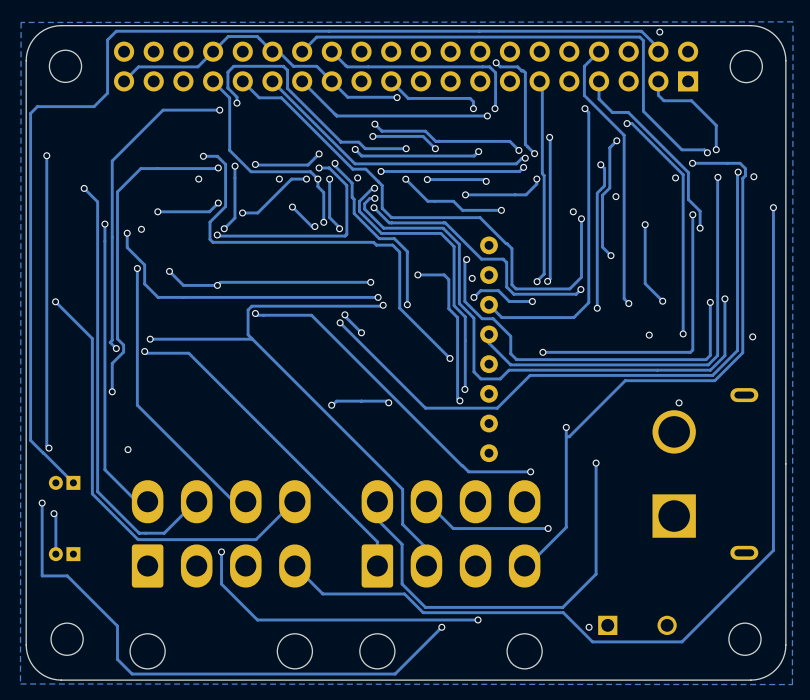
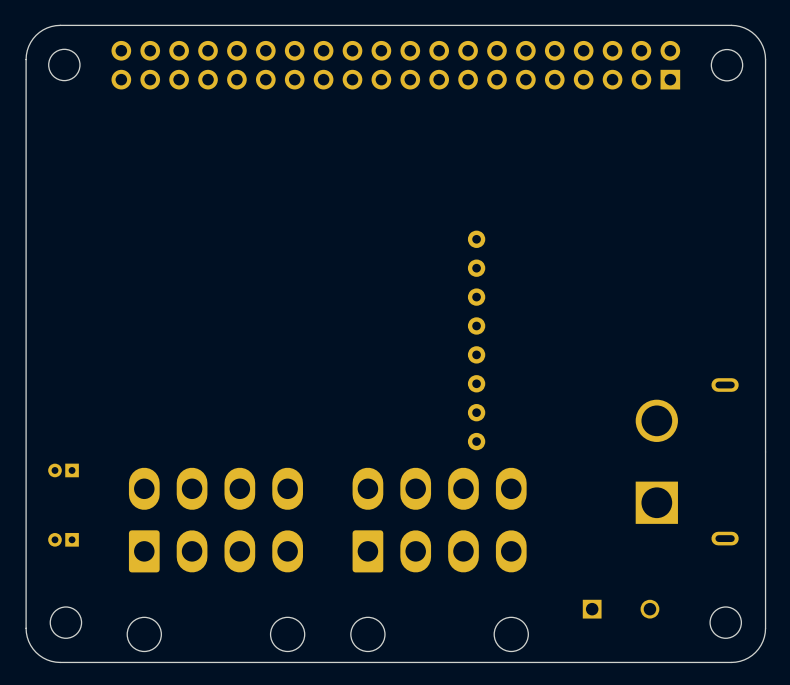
zone outline: (793, 21) (792, 684) (20, 683) (21, 22) (793, 21) -> none
via: (659, 32) -> none
track: (302, 48) (302, 51) (316, 37) (639, 37) (643, 40) (643, 111) (681, 149) (704, 149) (707, 152) -> none
track: (331, 51) (345, 65) -> none
track: (599, 51) (584, 66) (584, 95) (624, 135) (624, 298) (628, 303) -> none
track: (658, 51) (658, 48) (641, 31) (116, 31) (107, 40) (107, 93) (94, 106) (37, 106) (30, 113) (30, 440) (73, 482) -> none
track: (496, 62) (500, 66) (517, 66) (525, 72) (525, 144) (534, 153) -> none
via: (496, 62) -> none
track: (345, 65) (489, 66) (495, 72) (495, 108) -> none
track: (124, 81) (138, 66) (197, 66) (228, 36) (257, 36) (272, 51) (278, 51) (293, 66) (316, 66) (347, 97) (397, 97) -> none
track: (242, 81) (259, 97) (281, 97) (352, 169) (365, 169) (382, 185) (382, 208) (391, 217) (480, 217) (511, 248) (511, 284) (516, 288) (569, 288) (581, 277) (581, 218) -> none
track: (272, 81) (354, 163) (516, 163) (522, 158) (525, 158) -> none
track: (302, 81) (336, 115) (487, 115) -> none
track: (391, 81) (408, 98) (470, 98) (473, 101) (473, 108) -> none
track: (539, 81) (542, 84) (544, 274) -> none
track: (599, 81) (599, 99) (612, 112) (628, 112) (688, 172) (688, 199) (700, 211) (700, 228) -> none
track: (658, 81) (658, 95) (663, 100) (691, 100) (716, 125) (716, 149) -> none
track: (213, 83) (213, 81) (229, 97) (229, 150) (251, 171) (310, 171) (317, 179) (317, 186) (323, 192) (323, 222) -> none
via: (397, 97) -> none
track: (237, 103) (237, 97) (227, 88) (227, 72) (233, 66) (283, 66) (287, 70) (287, 88) (340, 142) (358, 142) (365, 148) (406, 148) -> none
via: (237, 103) -> none
via: (473, 108) -> none
via: (495, 108) -> none
track: (584, 108) (588, 112) (588, 302) (573, 317) (501, 317) (489, 304) -> none
via: (584, 108) -> none
track: (219, 110) (163, 110) (112, 160) (112, 340) (110, 342) (116, 348) -> none
via: (219, 110) -> none
via: (487, 115) -> none
track: (627, 123) (632, 123) (683, 174) (683, 333) -> none
via: (627, 123) -> none
track: (374, 124) (381, 131) (425, 131) (435, 141) (509, 141) (518, 150) -> none
via: (374, 124) -> none
track: (372, 136) (423, 136) (435, 148) -> none
via: (372, 136) -> none
track: (549, 137) (550, 278) (547, 281) -> none
via: (549, 137) -> none
track: (616, 140) (609, 147) (609, 187) (602, 195) (602, 247) (610, 255) -> none
via: (616, 140) -> none
via: (406, 148) -> none
via: (435, 148) -> none
track: (355, 149) (361, 156) (474, 156) (478, 151) -> none
via: (355, 149) -> none
via: (716, 149) -> none
via: (518, 150) -> none
via: (478, 151) -> none
via: (707, 152) -> none
track: (319, 153) (308, 165) (255, 164) -> none
via: (319, 153) -> none
via: (534, 153) -> none
track: (46, 155) (46, 445) (48, 448) -> none
via: (46, 155) -> none
track: (203, 156) (217, 156) (225, 164) (225, 206) (209, 222) (209, 239) (212, 242) (373, 242) (376, 245) (392, 245) (399, 252) (399, 308) (450, 358) -> none
via: (203, 156) -> none
via: (525, 158) -> none
track: (335, 163) (335, 166) (352, 183) (354, 213) (379, 238) (394, 238) (407, 251) (407, 304) -> none
via: (335, 163) -> none
track: (692, 163) (740, 163) (745, 168) (745, 175) (742, 178) (742, 352) (714, 380) (625, 380) (569, 436) (566, 436) -> none
via: (692, 163) -> none
via: (255, 164) -> none
track: (600, 164) (604, 168) (604, 185) (597, 193) (597, 308) -> none
via: (600, 164) -> none
track: (234, 166) (234, 218) (224, 228) -> none
via: (235, 166) -> none
track: (218, 167) (140, 168) (117, 191) (117, 338) (123, 345) (123, 352) (112, 363) (112, 391) -> none
via: (218, 167) -> none
track: (523, 167) (519, 171) (381, 171) -> none
via: (523, 167) -> none
track: (319, 168) (329, 168) (346, 185) (346, 234) (345, 236) (217, 235) -> none
via: (319, 168) -> none
via: (381, 171) -> none
track: (738, 172) (737, 350) (712, 375) (530, 375) (497, 408) (425, 408) (340, 322) -> none
via: (738, 172) -> none
via: (753, 176) -> none
via: (357, 177) -> none
via: (675, 177) -> none
track: (717, 177) (717, 355) (708, 364) (510, 364) (489, 343) (489, 334) -> none
via: (717, 177) -> none
via: (198, 179) -> none
via: (279, 179) -> none
track: (306, 179) (291, 179) (257, 212) (242, 212) -> none
via: (306, 179) -> none
via: (317, 179) -> none
track: (329, 179) (329, 217) (339, 228) -> none
via: (329, 179) -> none
track: (405, 179) (427, 201) (453, 201) (462, 210) (501, 210) -> none
via: (405, 179) -> none
track: (427, 179) (484, 179) (486, 181) -> none
via: (427, 179) -> none
track: (536, 179) (536, 184) (526, 194) (465, 194) -> none
via: (536, 179) -> none
via: (486, 181) -> none
track: (84, 188) (97, 201) (97, 491) (139, 533) (164, 533) (196, 501) -> none
via: (84, 188) -> none
track: (374, 188) (359, 201) (359, 211) (381, 233) (440, 233) (454, 246) (454, 305) (465, 316) (464, 389) -> none
via: (374, 188) -> none
via: (465, 194) -> none
via: (615, 196) -> none
track: (374, 198) (369, 198) (364, 203) (364, 209) (383, 228) (443, 228) (459, 244) (459, 303) (473, 318) (473, 371) (480, 378) (500, 378) (509, 370) (710, 370) (724, 355) (724, 298) -> none
via: (374, 198) -> none
track: (218, 203) (209, 211) (157, 211) -> none
via: (218, 203) -> none
track: (292, 207) (311, 226) (314, 226) -> none
via: (292, 207) -> none
track: (374, 207) (389, 222) (445, 222) (481, 259) (503, 259) (506, 262) (506, 287) (513, 294) (576, 294) (580, 289) -> none
via: (374, 207) -> none
track: (773, 207) (773, 550) (681, 641) (592, 641) (563, 612) (423, 612) (404, 593) (322, 593) (294, 566) -> none
via: (773, 207) -> none
via: (501, 210) -> none
via: (157, 211) -> none
via: (573, 211) -> none
via: (242, 212) -> none
track: (692, 214) (692, 350) (690, 352) (542, 352) -> none
via: (692, 214) -> none
via: (581, 218) -> none
via: (323, 222) -> none
track: (104, 224) (104, 469) (136, 501) (147, 501) (147, 495) -> none
via: (104, 224) -> none
track: (645, 224) (645, 283) (662, 301) -> none
via: (645, 224) -> none
via: (314, 226) -> none
via: (224, 228) -> none
via: (339, 228) -> none
via: (700, 228) -> none
via: (141, 229) -> none
track: (127, 233) (127, 247) (144, 264) (144, 283) (158, 297) (378, 297) -> none
via: (127, 233) -> none
via: (217, 235) -> none
via: (610, 255) -> none
track: (466, 259) (464, 261) (464, 301) (482, 318) (493, 318) (510, 336) (510, 353) (516, 359) (706, 359) (710, 355) (710, 302) -> none
via: (466, 259) -> none
track: (137, 268) (137, 405) (233, 501) (245, 501) -> none
via: (137, 268) -> none
track: (169, 271) (183, 285) (217, 285) (220, 282) (370, 282) -> none
via: (169, 271) -> none
track: (417, 274) (444, 274) (448, 279) (448, 308) (457, 317) (457, 398) (459, 400) -> none
via: (417, 274) -> none
track: (544, 274) (537, 281) -> none
via: (472, 278) -> none
via: (537, 281) -> none
via: (547, 281) -> none
via: (370, 282) -> none
via: (217, 285) -> none
via: (580, 289) -> none
via: (378, 297) -> none
track: (473, 297) (480, 290) (498, 290) (509, 301) (532, 301) -> none
via: (473, 297) -> none
via: (724, 298) -> none
track: (55, 301) (92, 338) (92, 493) (138, 539) (255, 539) (293, 501) (294, 513) -> none
via: (55, 301) -> none
via: (532, 301) -> none
via: (662, 301) -> none
via: (710, 302) -> none
via: (628, 303) -> none
via: (407, 304) -> none
track: (383, 305) (251, 306) (248, 309) (248, 334) (402, 489) (402, 524) (426, 548) (426, 566) -> none
via: (383, 305) -> none
via: (597, 308) -> none
track: (255, 313) (257, 315) (311, 315) (468, 471) (530, 471) -> none
via: (255, 313) -> none
track: (344, 314) (361, 332) -> none
via: (344, 314) -> none
via: (340, 322) -> none
via: (361, 332) -> none
via: (683, 333) -> none
via: (649, 335) -> none
via: (752, 336) -> none
via: (150, 339) -> none
track: (252, 339) (150, 339) -> none
via: (116, 348) -> none
track: (144, 351) (146, 353) (188, 353) (377, 541) (377, 566) -> none
via: (144, 351) -> none
via: (542, 352) -> none
via: (450, 358) -> none
via: (464, 389) -> none
via: (112, 391) -> none
via: (459, 400) -> none
track: (388, 402) (387, 401) (336, 401) (331, 405) -> none
via: (388, 402) -> none
via: (679, 402) -> none
via: (331, 405) -> none
track: (566, 427) (566, 527) (527, 566) (524, 566) -> none
via: (566, 427) -> none
via: (48, 448) -> none
via: (128, 449) -> none
track: (596, 463) (596, 574) (562, 607) (425, 607) (402, 584) (402, 544) (377, 519) (377, 501) -> none
via: (596, 463) -> none
via: (530, 471) -> none
track: (426, 501) (453, 528) (548, 528) -> none
track: (42, 503) (42, 575) (67, 575) (117, 626) (117, 659) (132, 674) (395, 674) (441, 627) -> none
via: (42, 503) -> none
track: (54, 513) (55, 515) (55, 554) -> none
via: (54, 513) -> none
via: (548, 528) -> none
track: (221, 551) (221, 584) (257, 619) (478, 619) -> none
via: (221, 551) -> none
via: (478, 619) -> none
via: (441, 627) -> none
via: (589, 627) -> none

